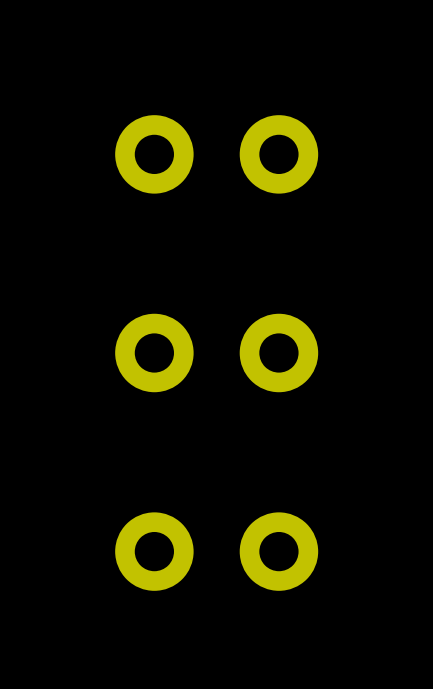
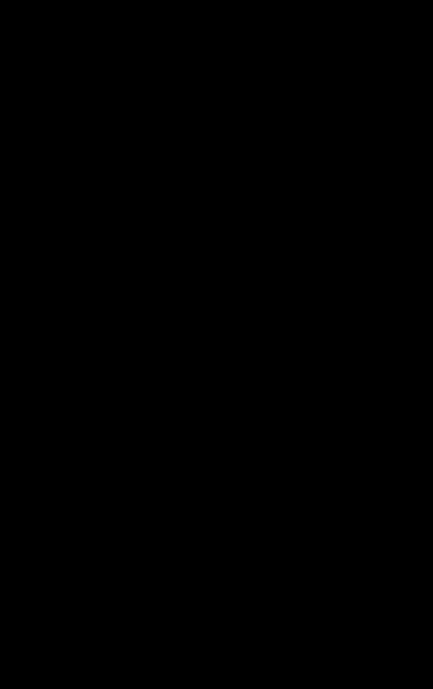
part: (216, 154) -> none
part: (216, 352) -> none
part: (216, 551) -> none

